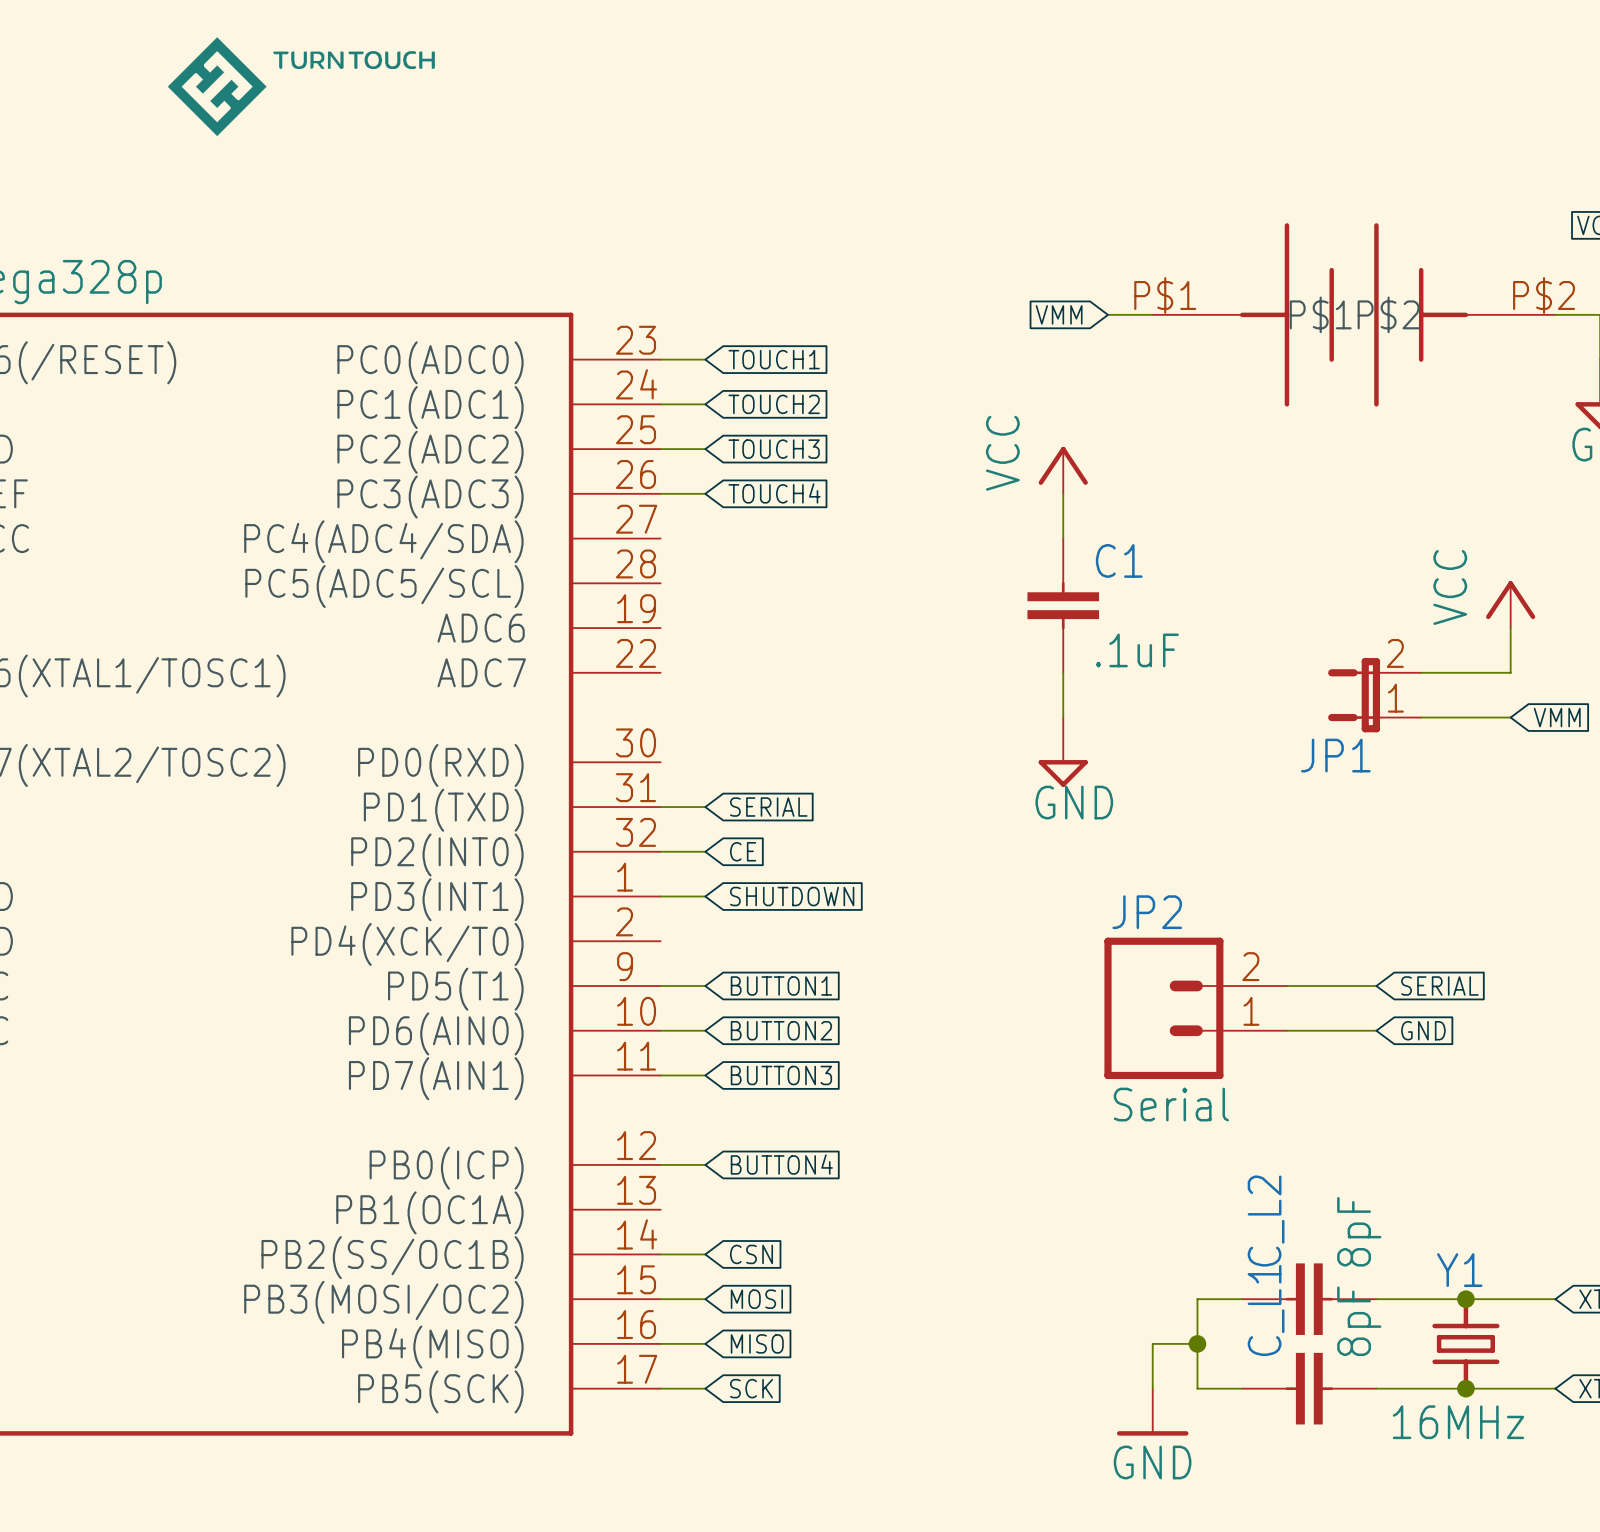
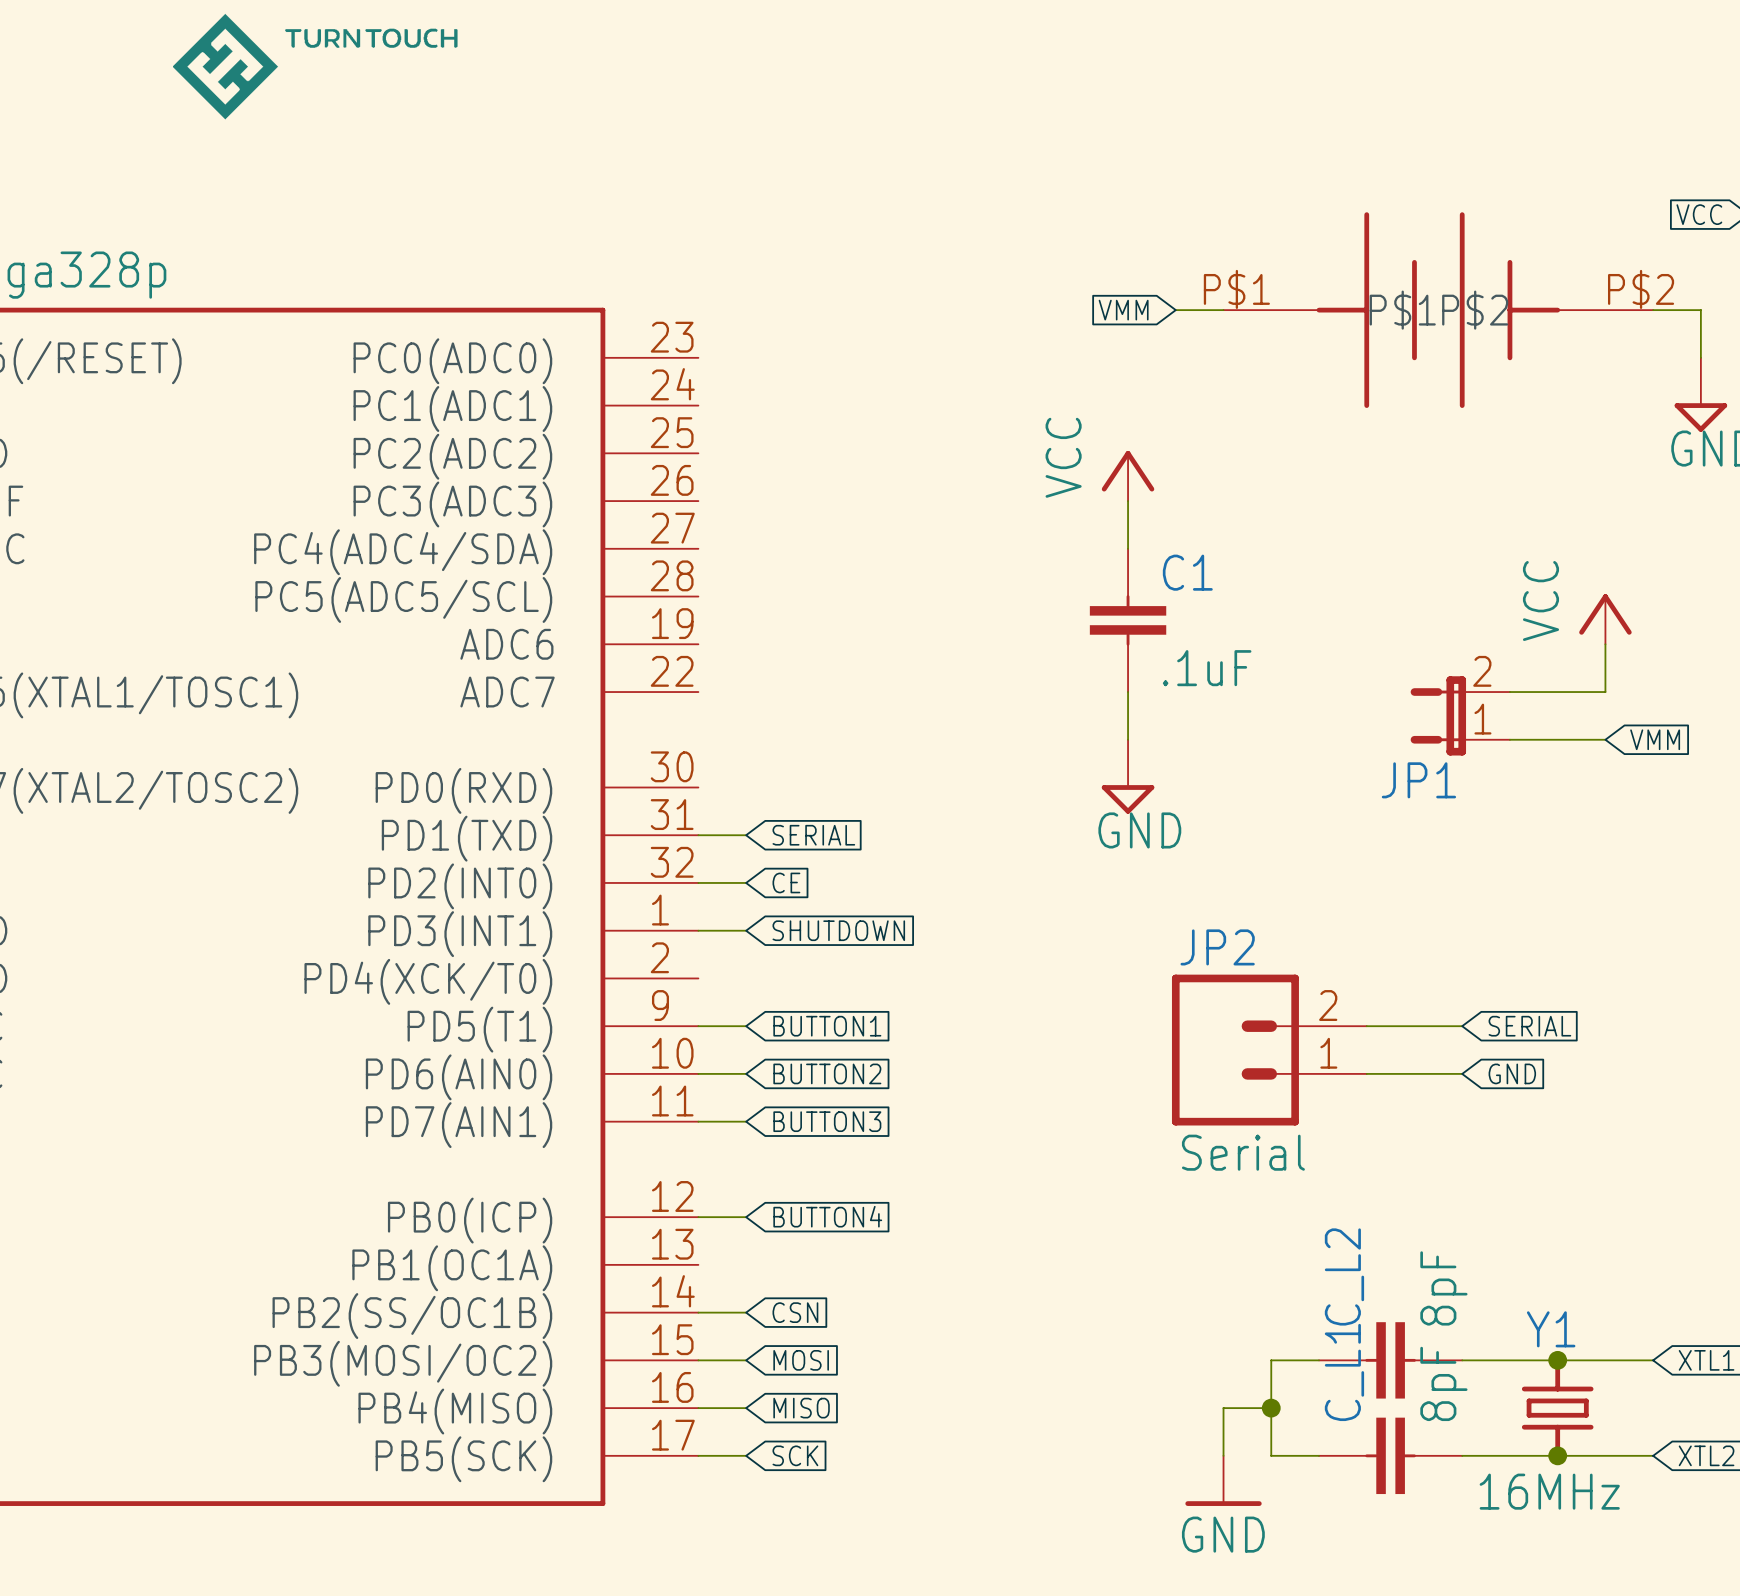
wire: (660, 359) (705, 359) -> none
global label: TOUCH1 (774, 359) -> none
wire: (660, 404) (705, 404) -> none
global label: TOUCH2 (774, 404) -> none
wire: (660, 449) (705, 449) -> none
global label: TOUCH3 (774, 449) -> none
wire: (660, 493) (705, 493) -> none
global label: TOUCH4 (774, 493) -> none

